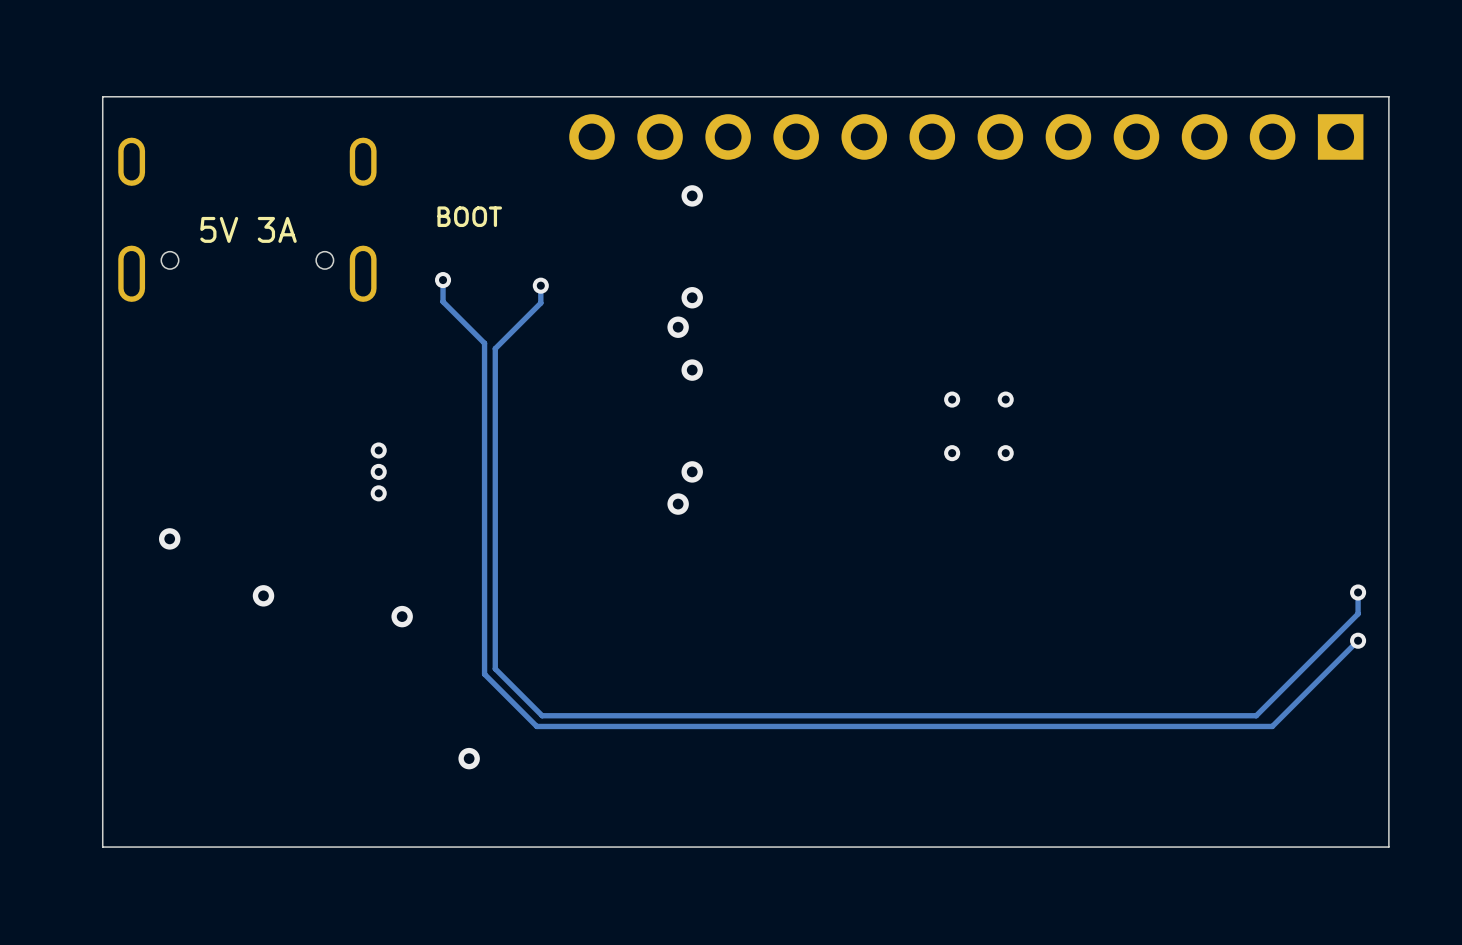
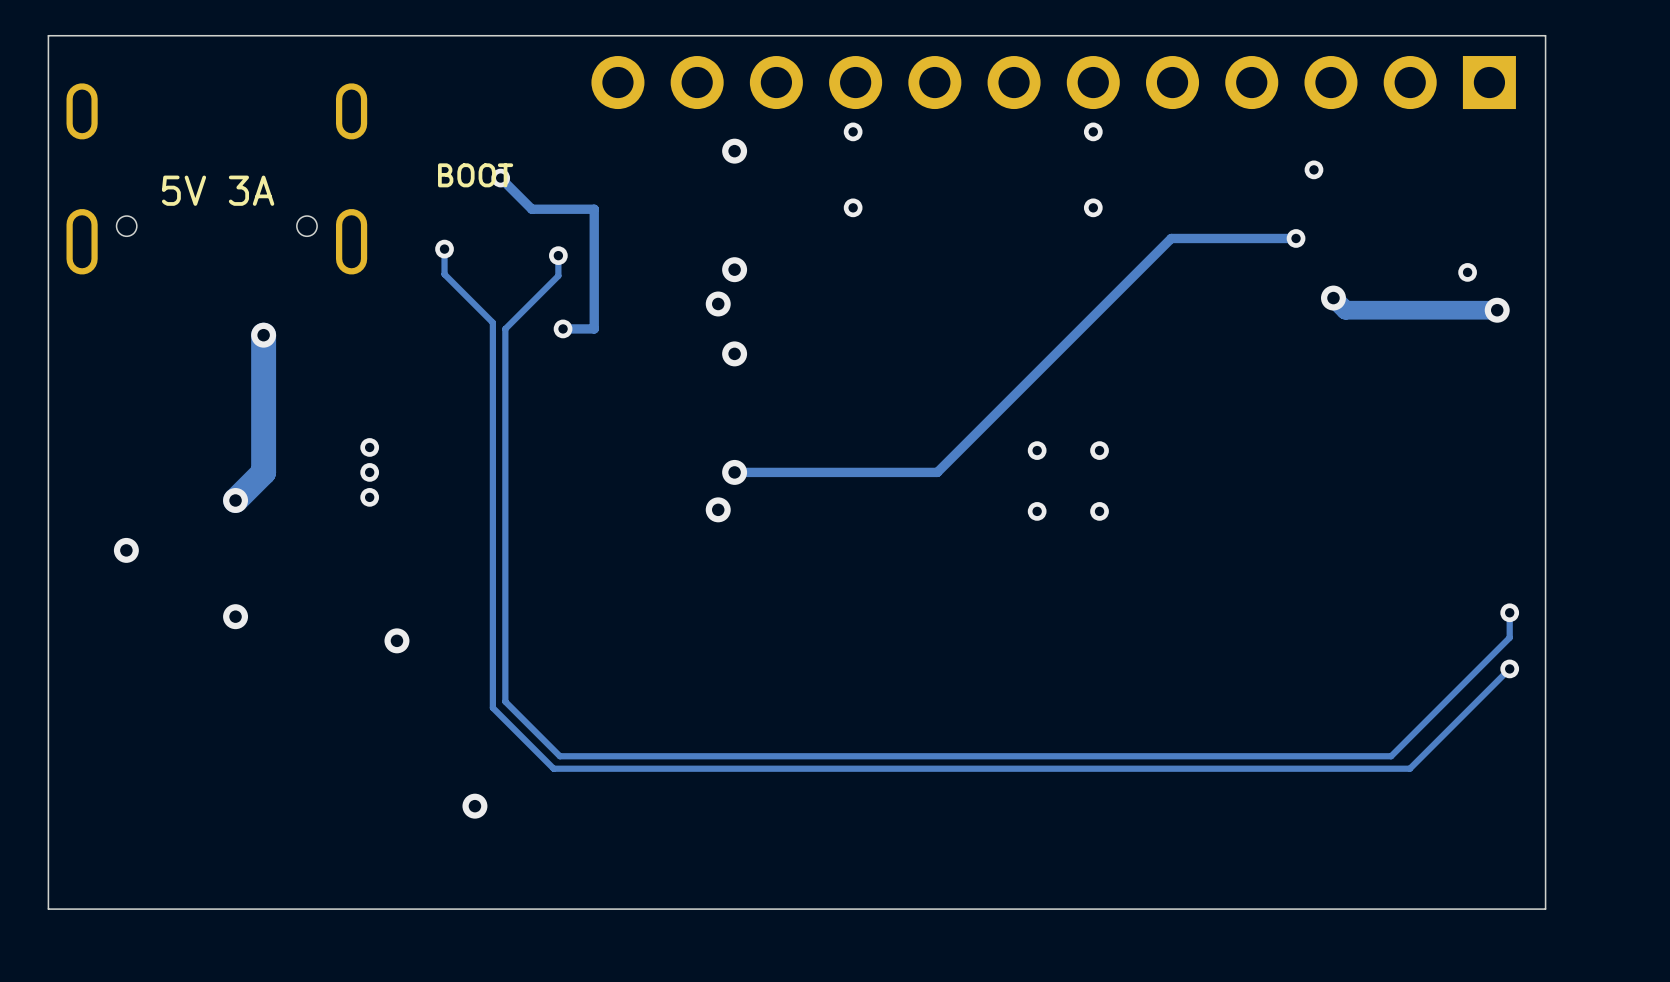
via: none -> (853, 131)
via: none -> (1093, 131)
via: none -> (1313, 169)
track: none -> (500, 178) (531, 209) (594, 209) (594, 328) (563, 328)
via: none -> (500, 178)
via: none -> (853, 207)
via: none -> (1093, 207)
track: none -> (1296, 238) (1171, 238) (937, 472) (734, 472)
via: none -> (1296, 238)
via: none -> (1467, 272)
track: none -> (1333, 298) (1345, 310) (1497, 310)
via: none -> (1333, 298)
via: none -> (1497, 310)
via: none -> (563, 328)
track: none -> (263, 335) (263, 472) (235, 500)
via: none -> (263, 335)
via: (952, 399) -> none
via: (1005, 399) -> none
via: none -> (235, 500)
via: none -> (1037, 511)
via: none -> (1099, 511)

